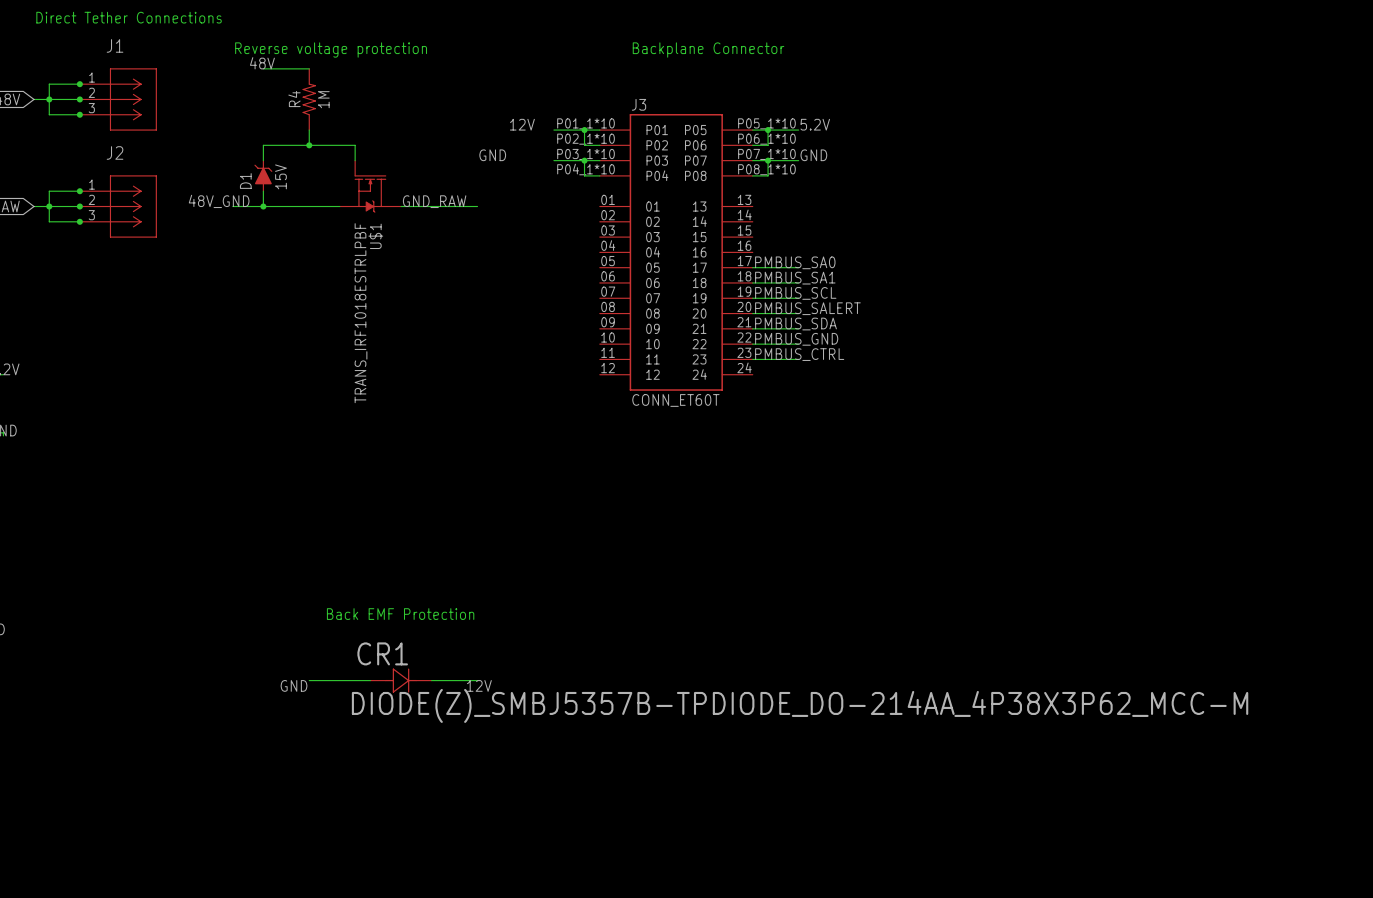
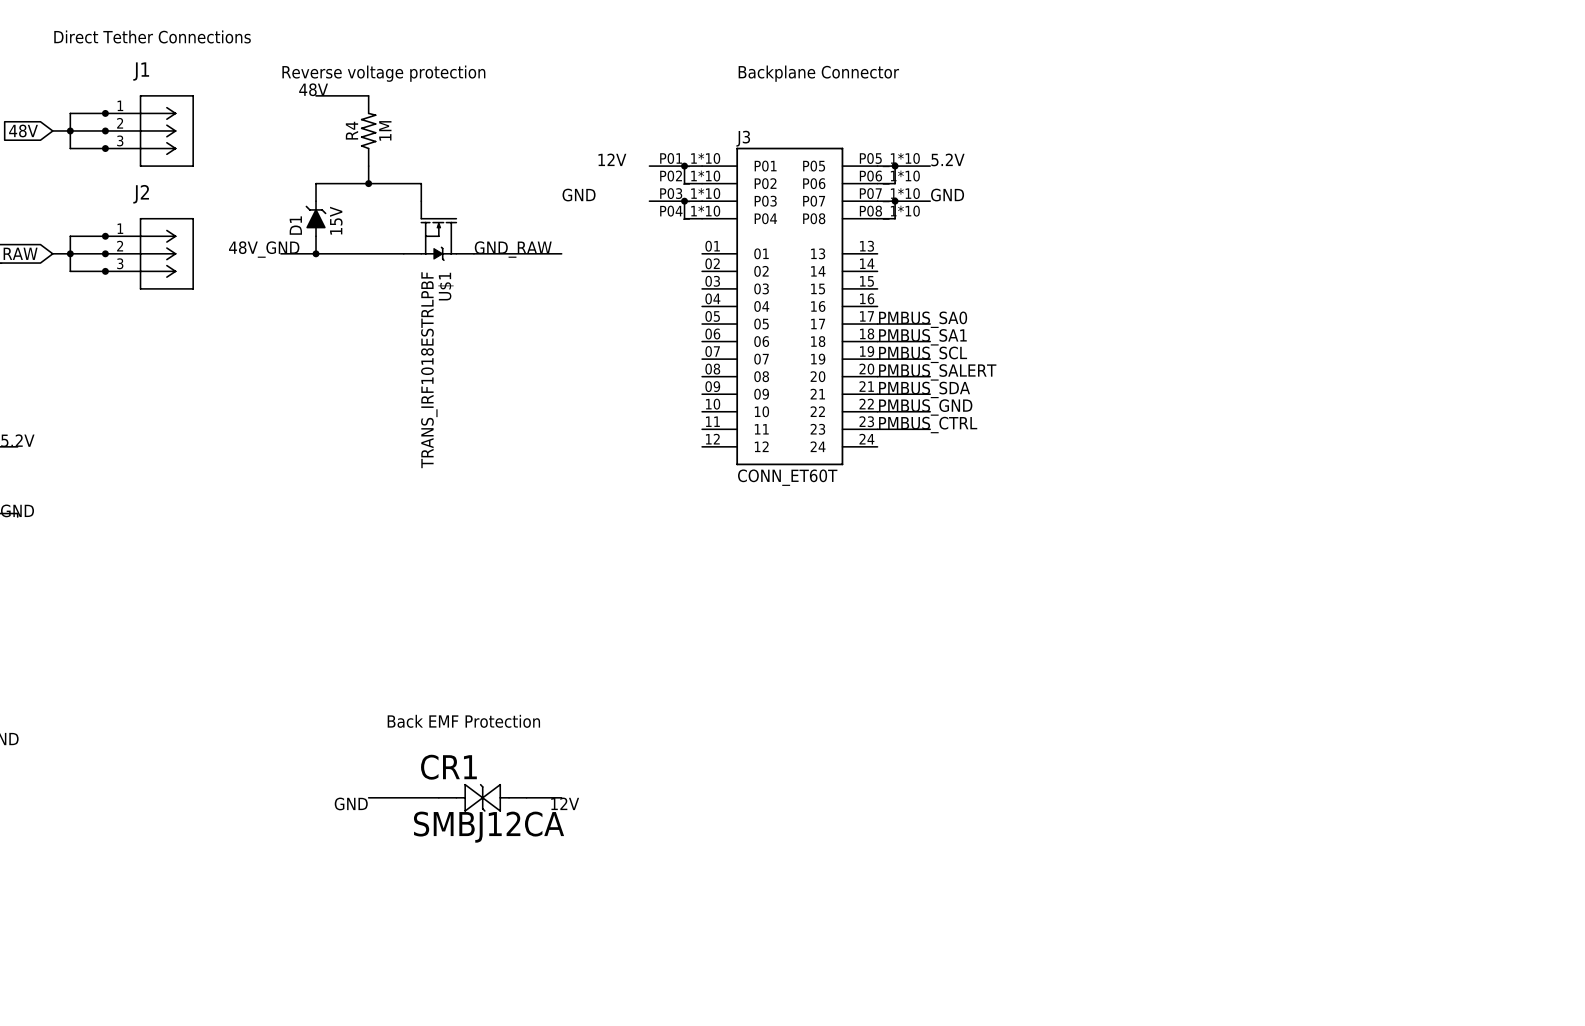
CR1 symbol: [370, 668, 432, 693] -> [438, 783, 527, 812]
CR1 value: DIODE(Z)_SMBJ5357B-TPDIODE_DO-214AA_4P38X3P62_MCC-M (800, 705) -> SMBJ12CA (489, 827)

